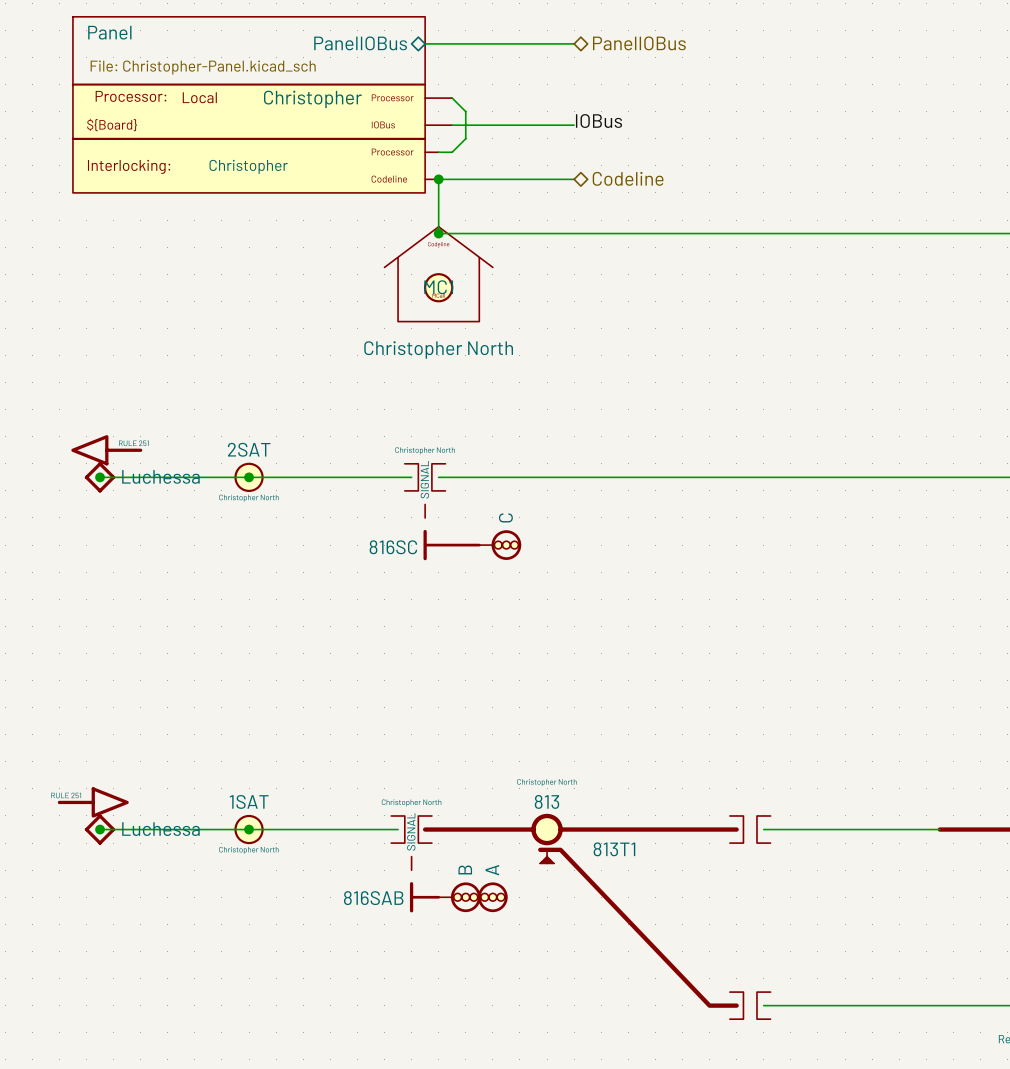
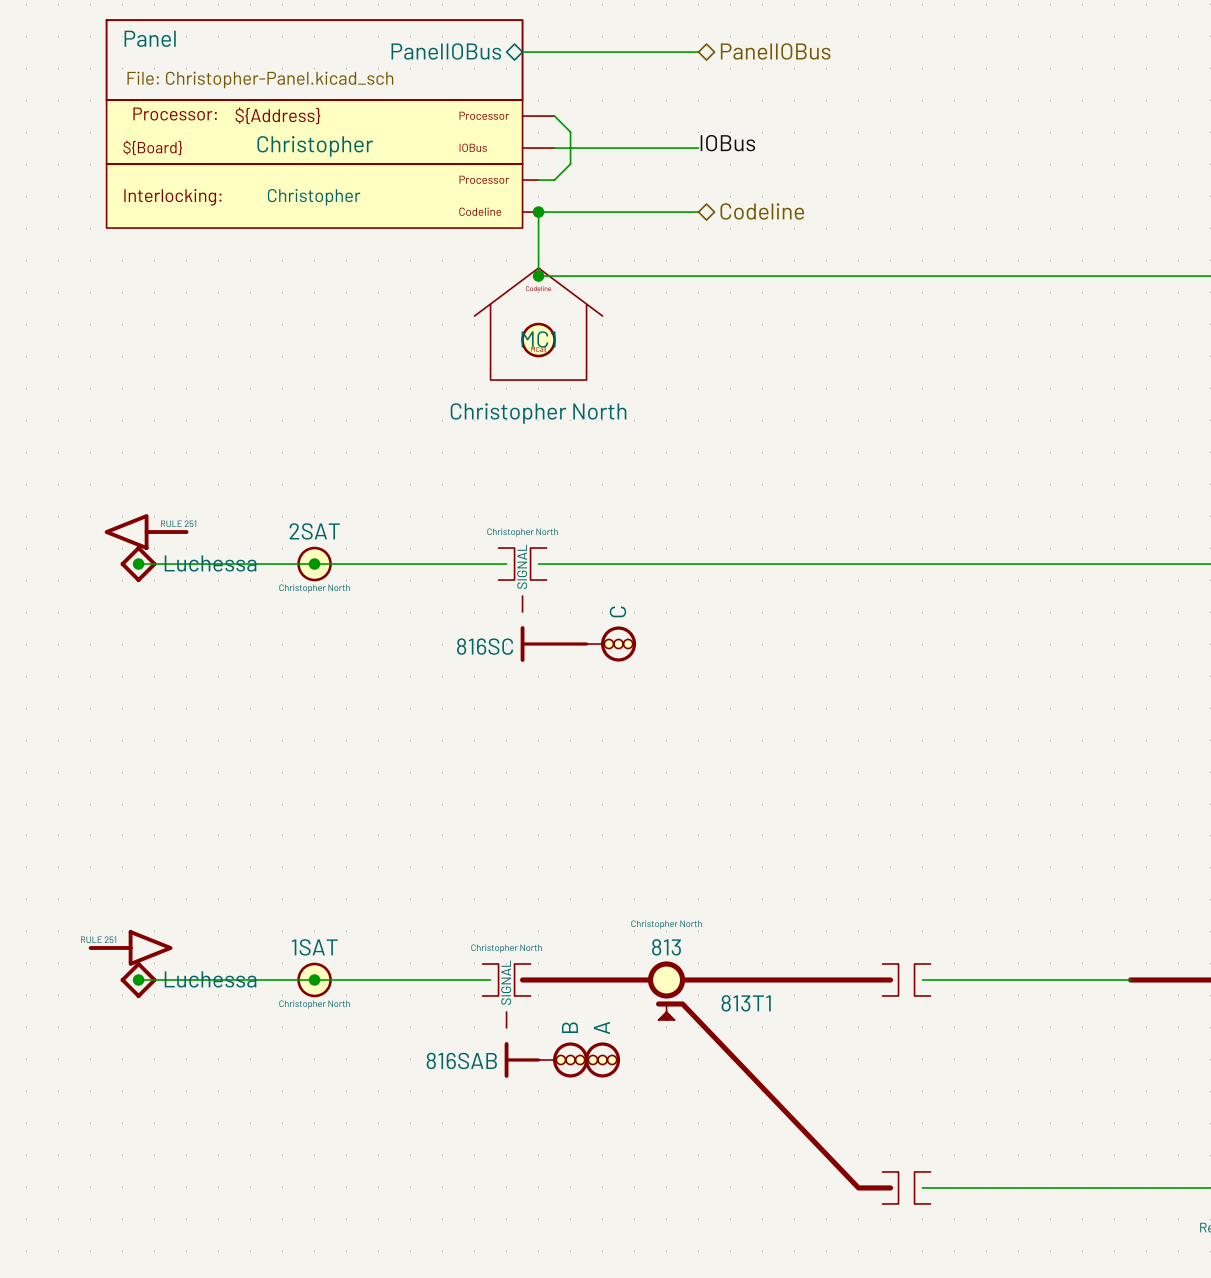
part text: Local (199, 97) -> ${Address} (277, 115)
part value position: Christopher (312, 99) -> Christopher (315, 146)

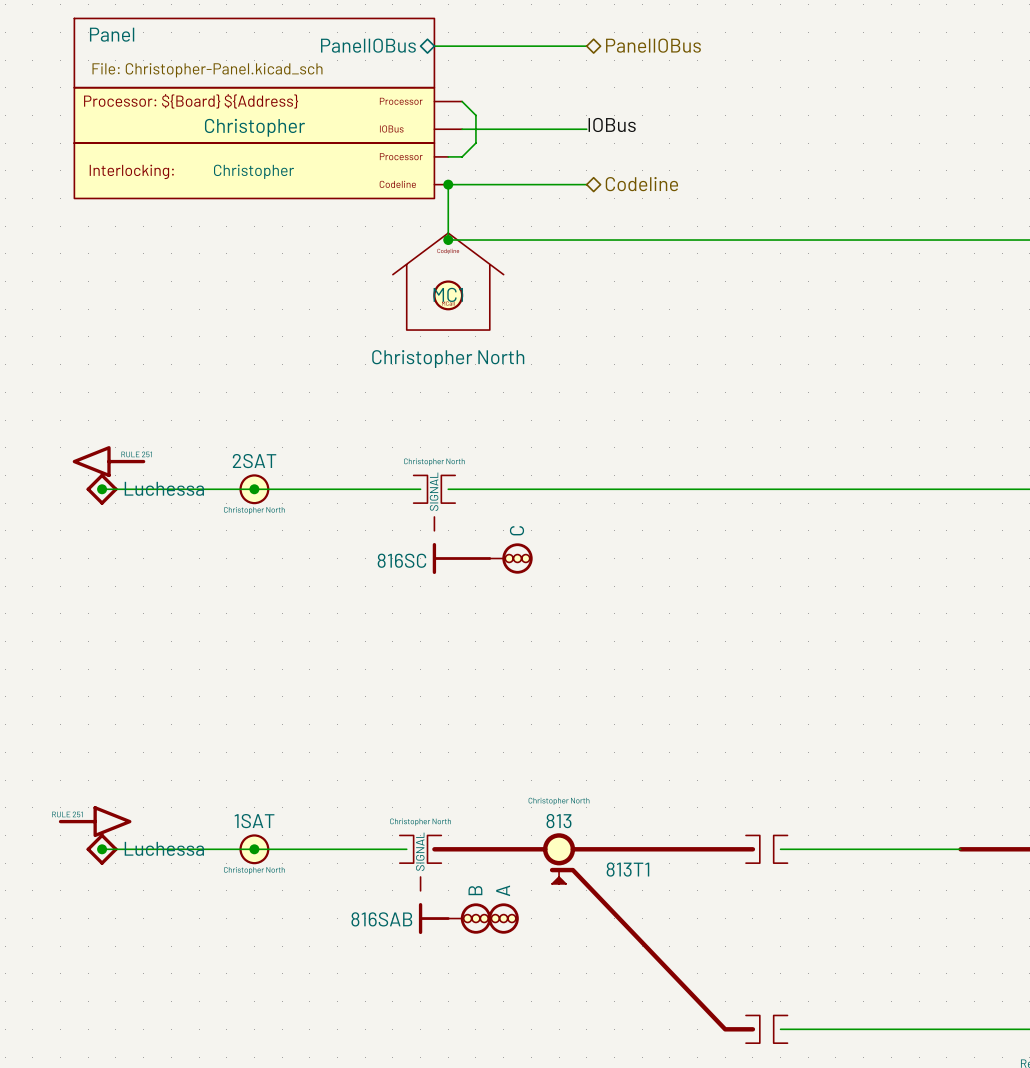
part text: Processor: (175, 114) -> none
part text: none -> Processor: ${Board} ${Address} (191, 101)
part text: ${Address} (277, 115) -> none
part text: ${Board} (152, 147) -> none

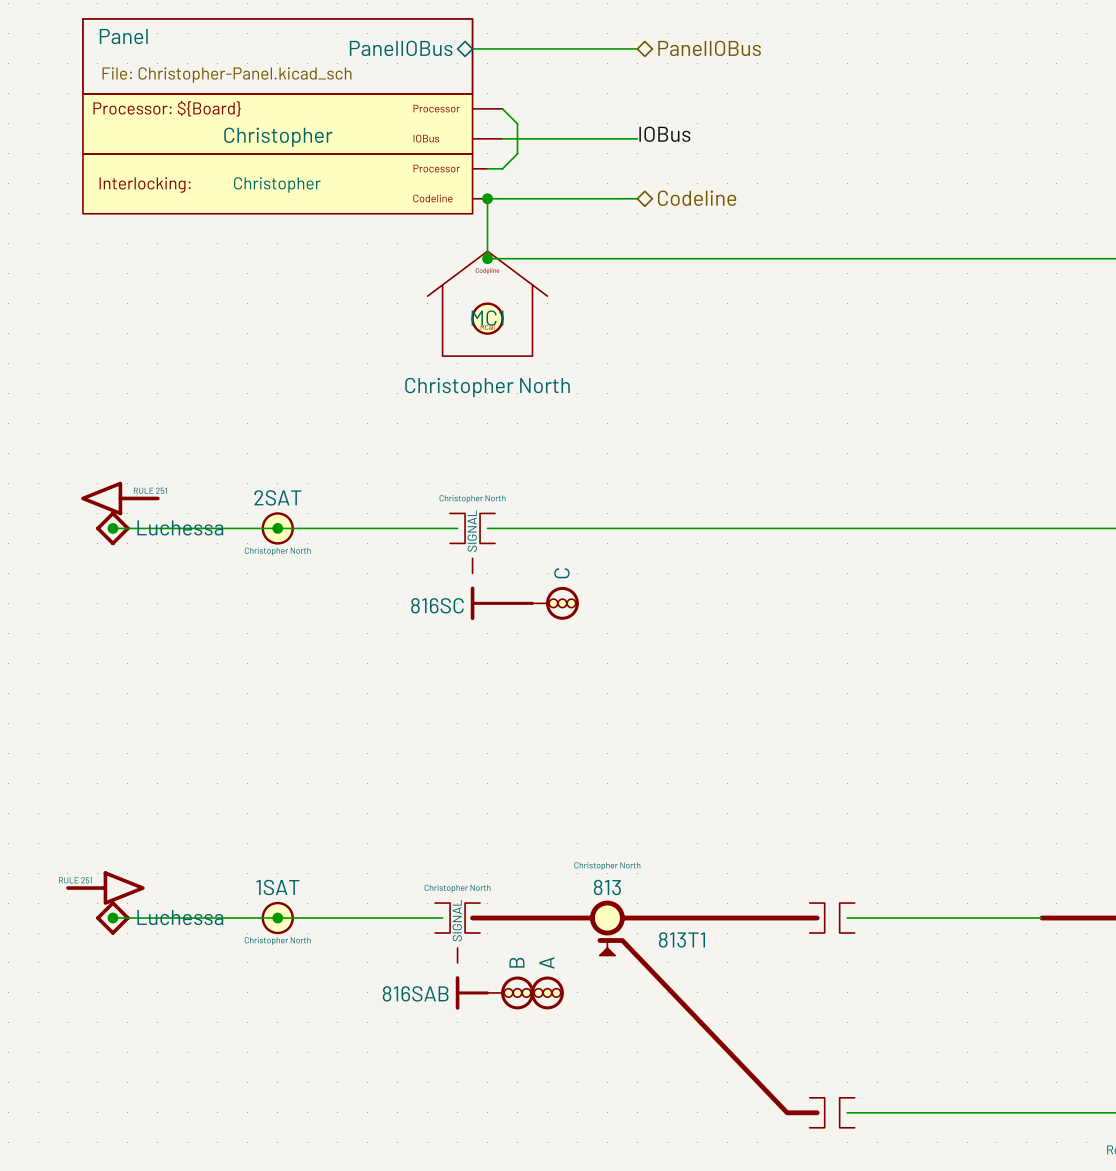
part text: Processor: ${Board} ${Address} (191, 101) -> Processor: ${Board} (167, 108)

